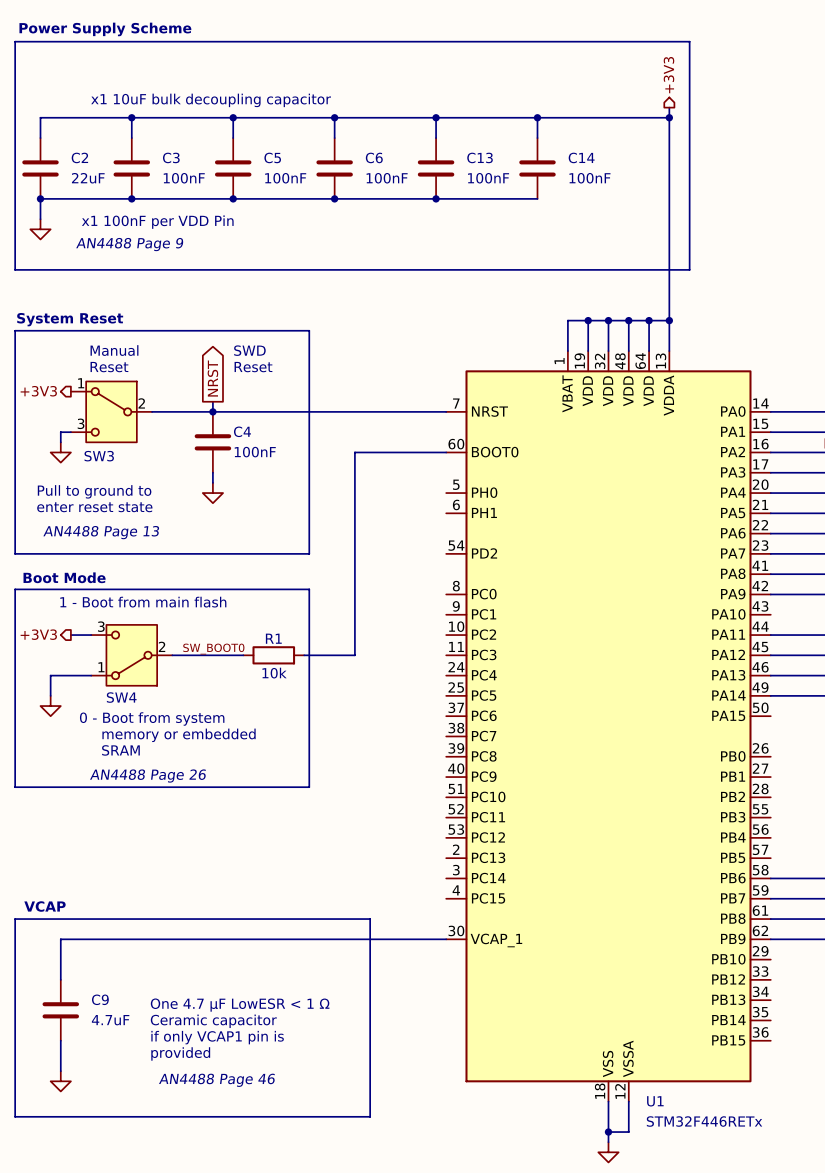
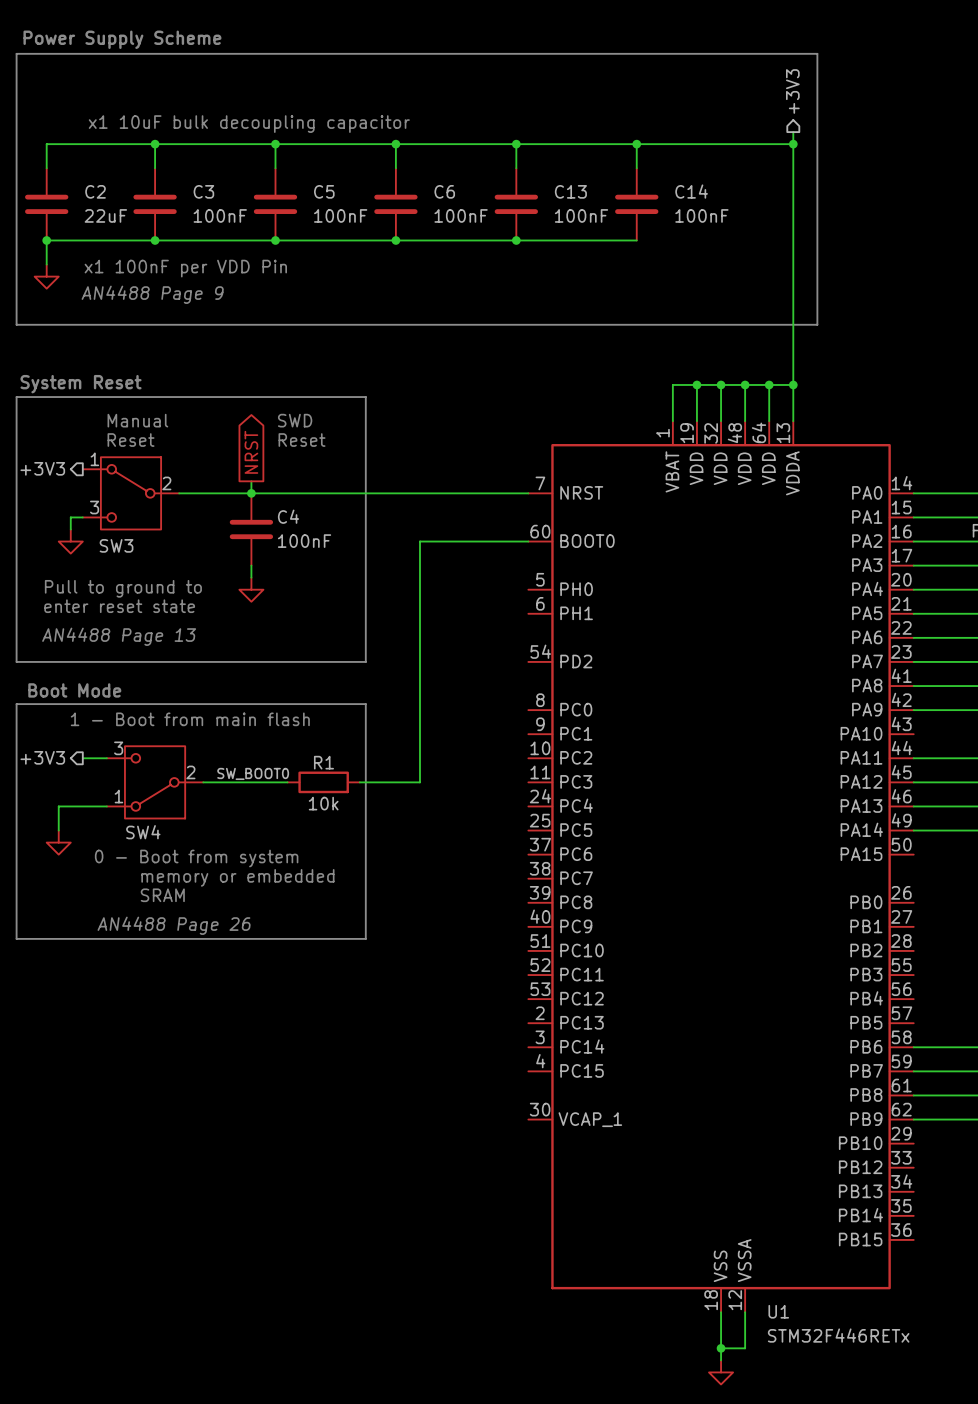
text: VCAP (44, 906) -> none
line: (15, 919) (370, 919) (370, 1116) (15, 1116) (15, 919) -> none
wire: (446, 939) (60, 939) (60, 979) -> none
text: One 4.7 μF LowESR < 1 Ω (240, 1005) -> none
C9: 4.7uF (60, 1010) -> none
text: Ceramic capacitor (213, 1021) -> none
text: if only VCAP1 pin is (217, 1037) -> none
wire: (60, 1040) (60, 1071) -> none
text: provided (180, 1053) -> none
text: AN4488 Page 46 (216, 1080) -> none
power symbol: (60, 1081) -> none

